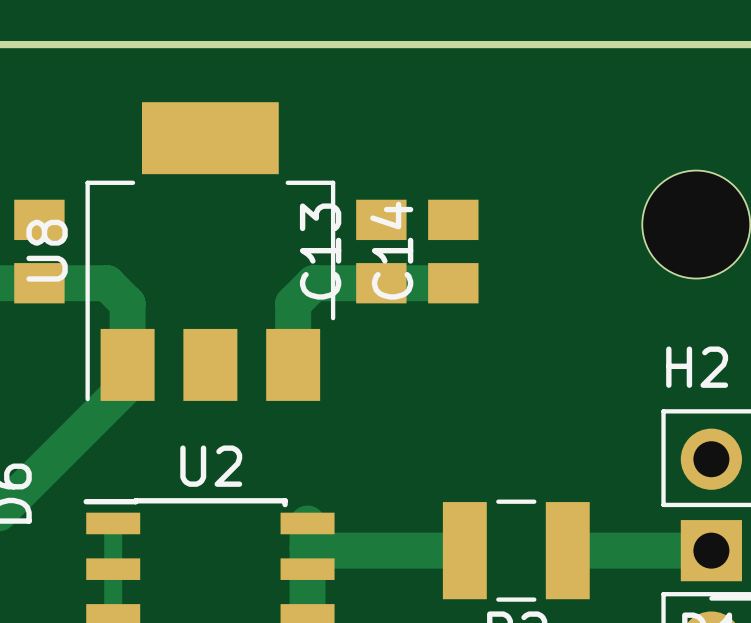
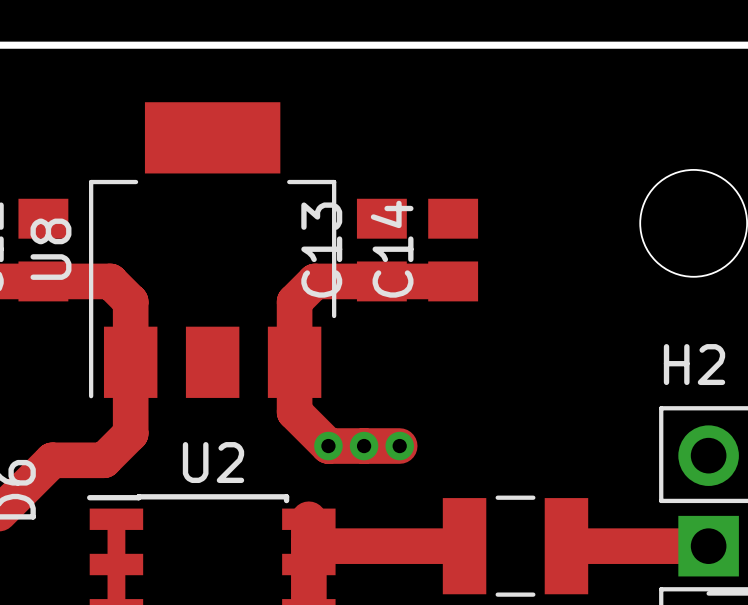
track: none -> (294, 362) (294, 412) (328, 446) (399, 446)
track: (127, 384) (48, 463) -> (130, 381) (130, 433) (103, 460) (52, 460)
via: none -> (328, 446)
via: none -> (364, 446)
via: none -> (399, 446)

